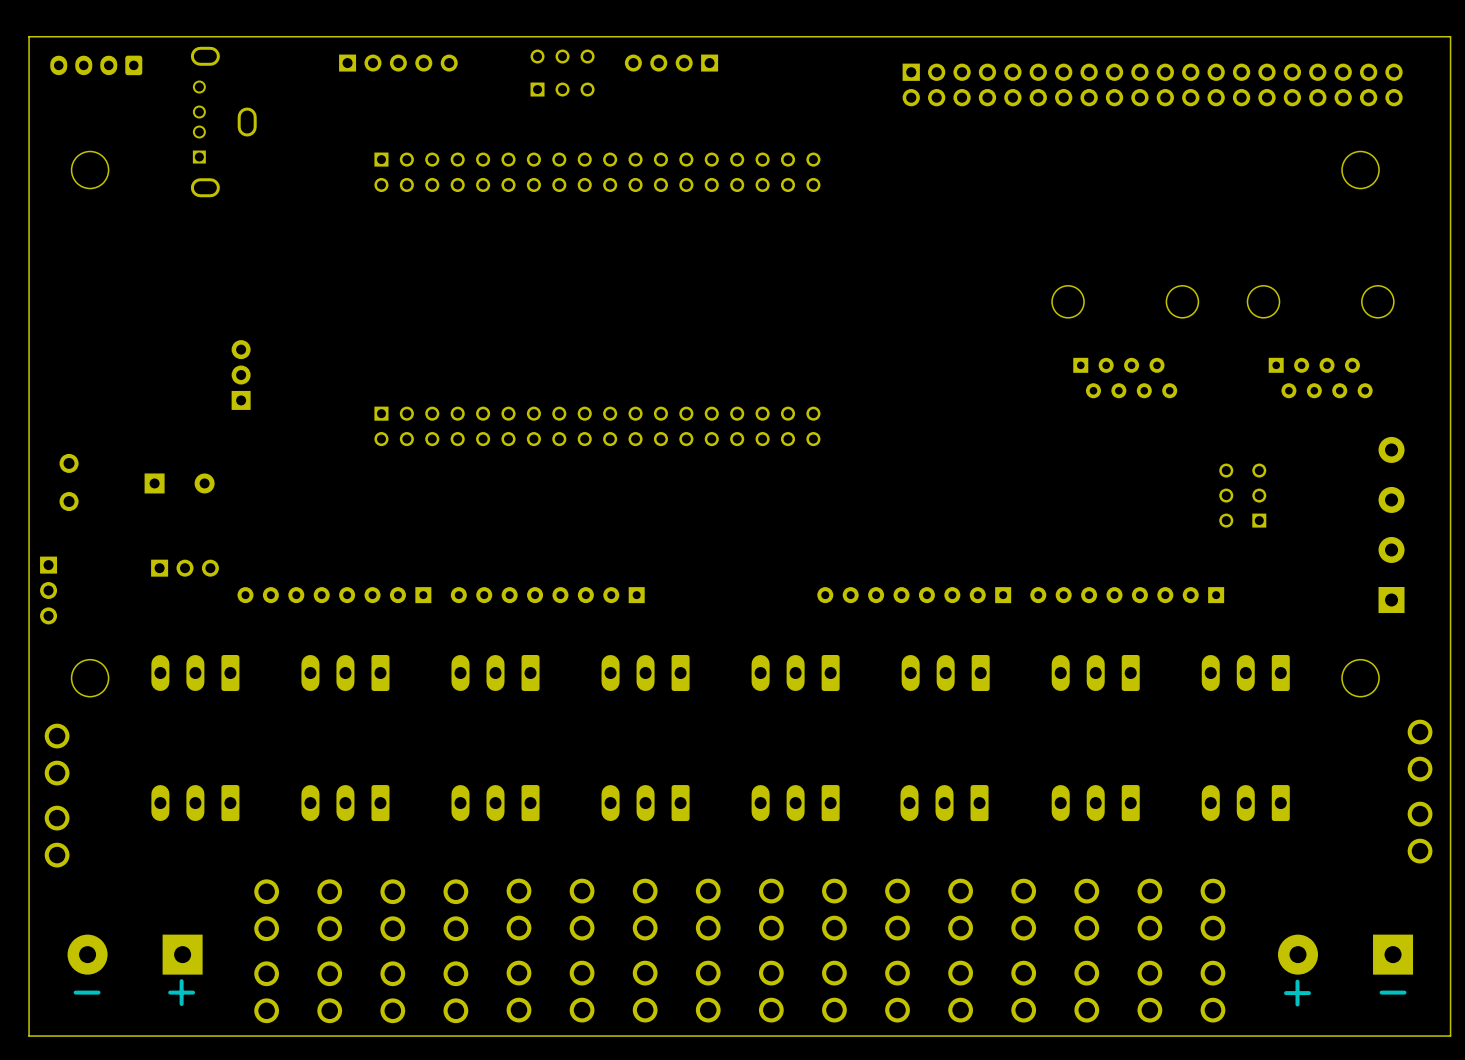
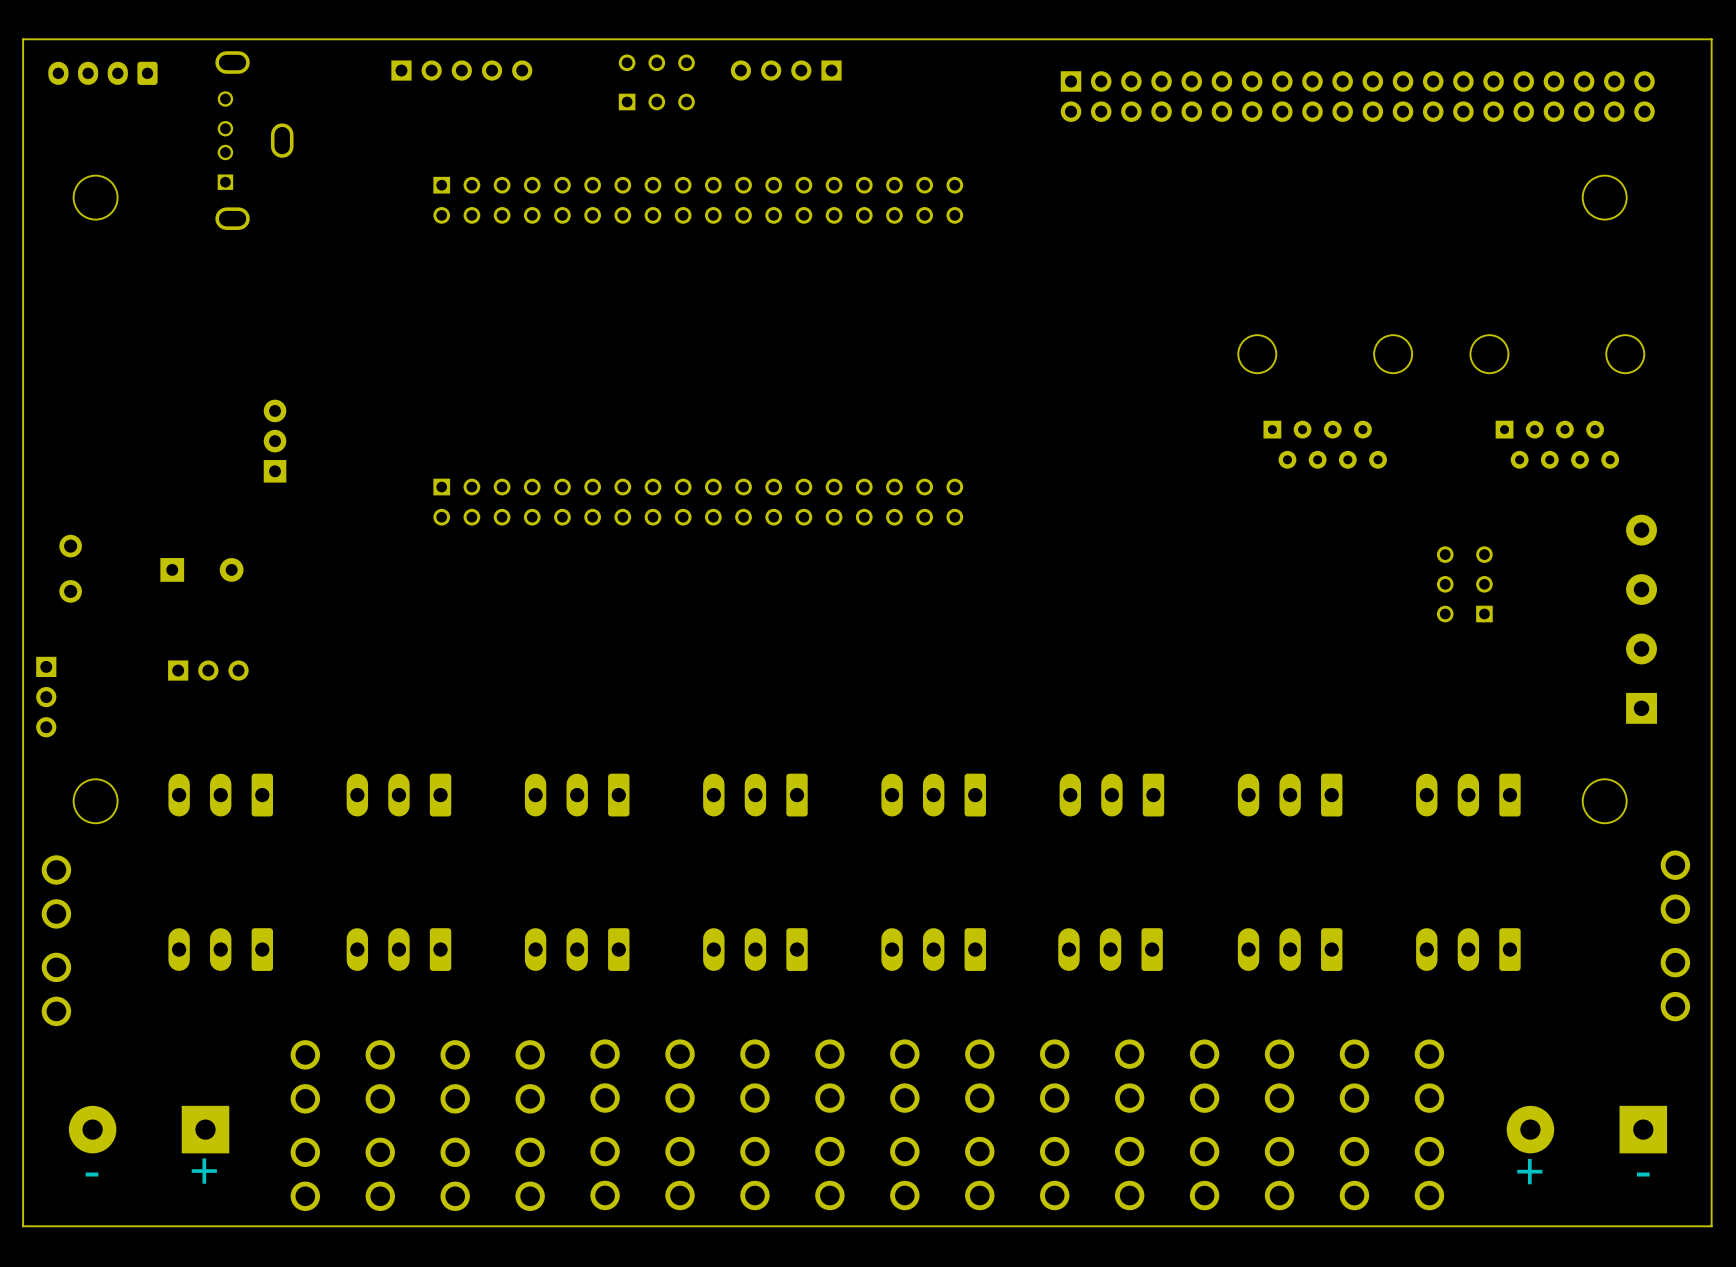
part: (334, 595) -> none
part: (547, 595) -> none
part: (914, 595) -> none
part: (1127, 595) -> none

